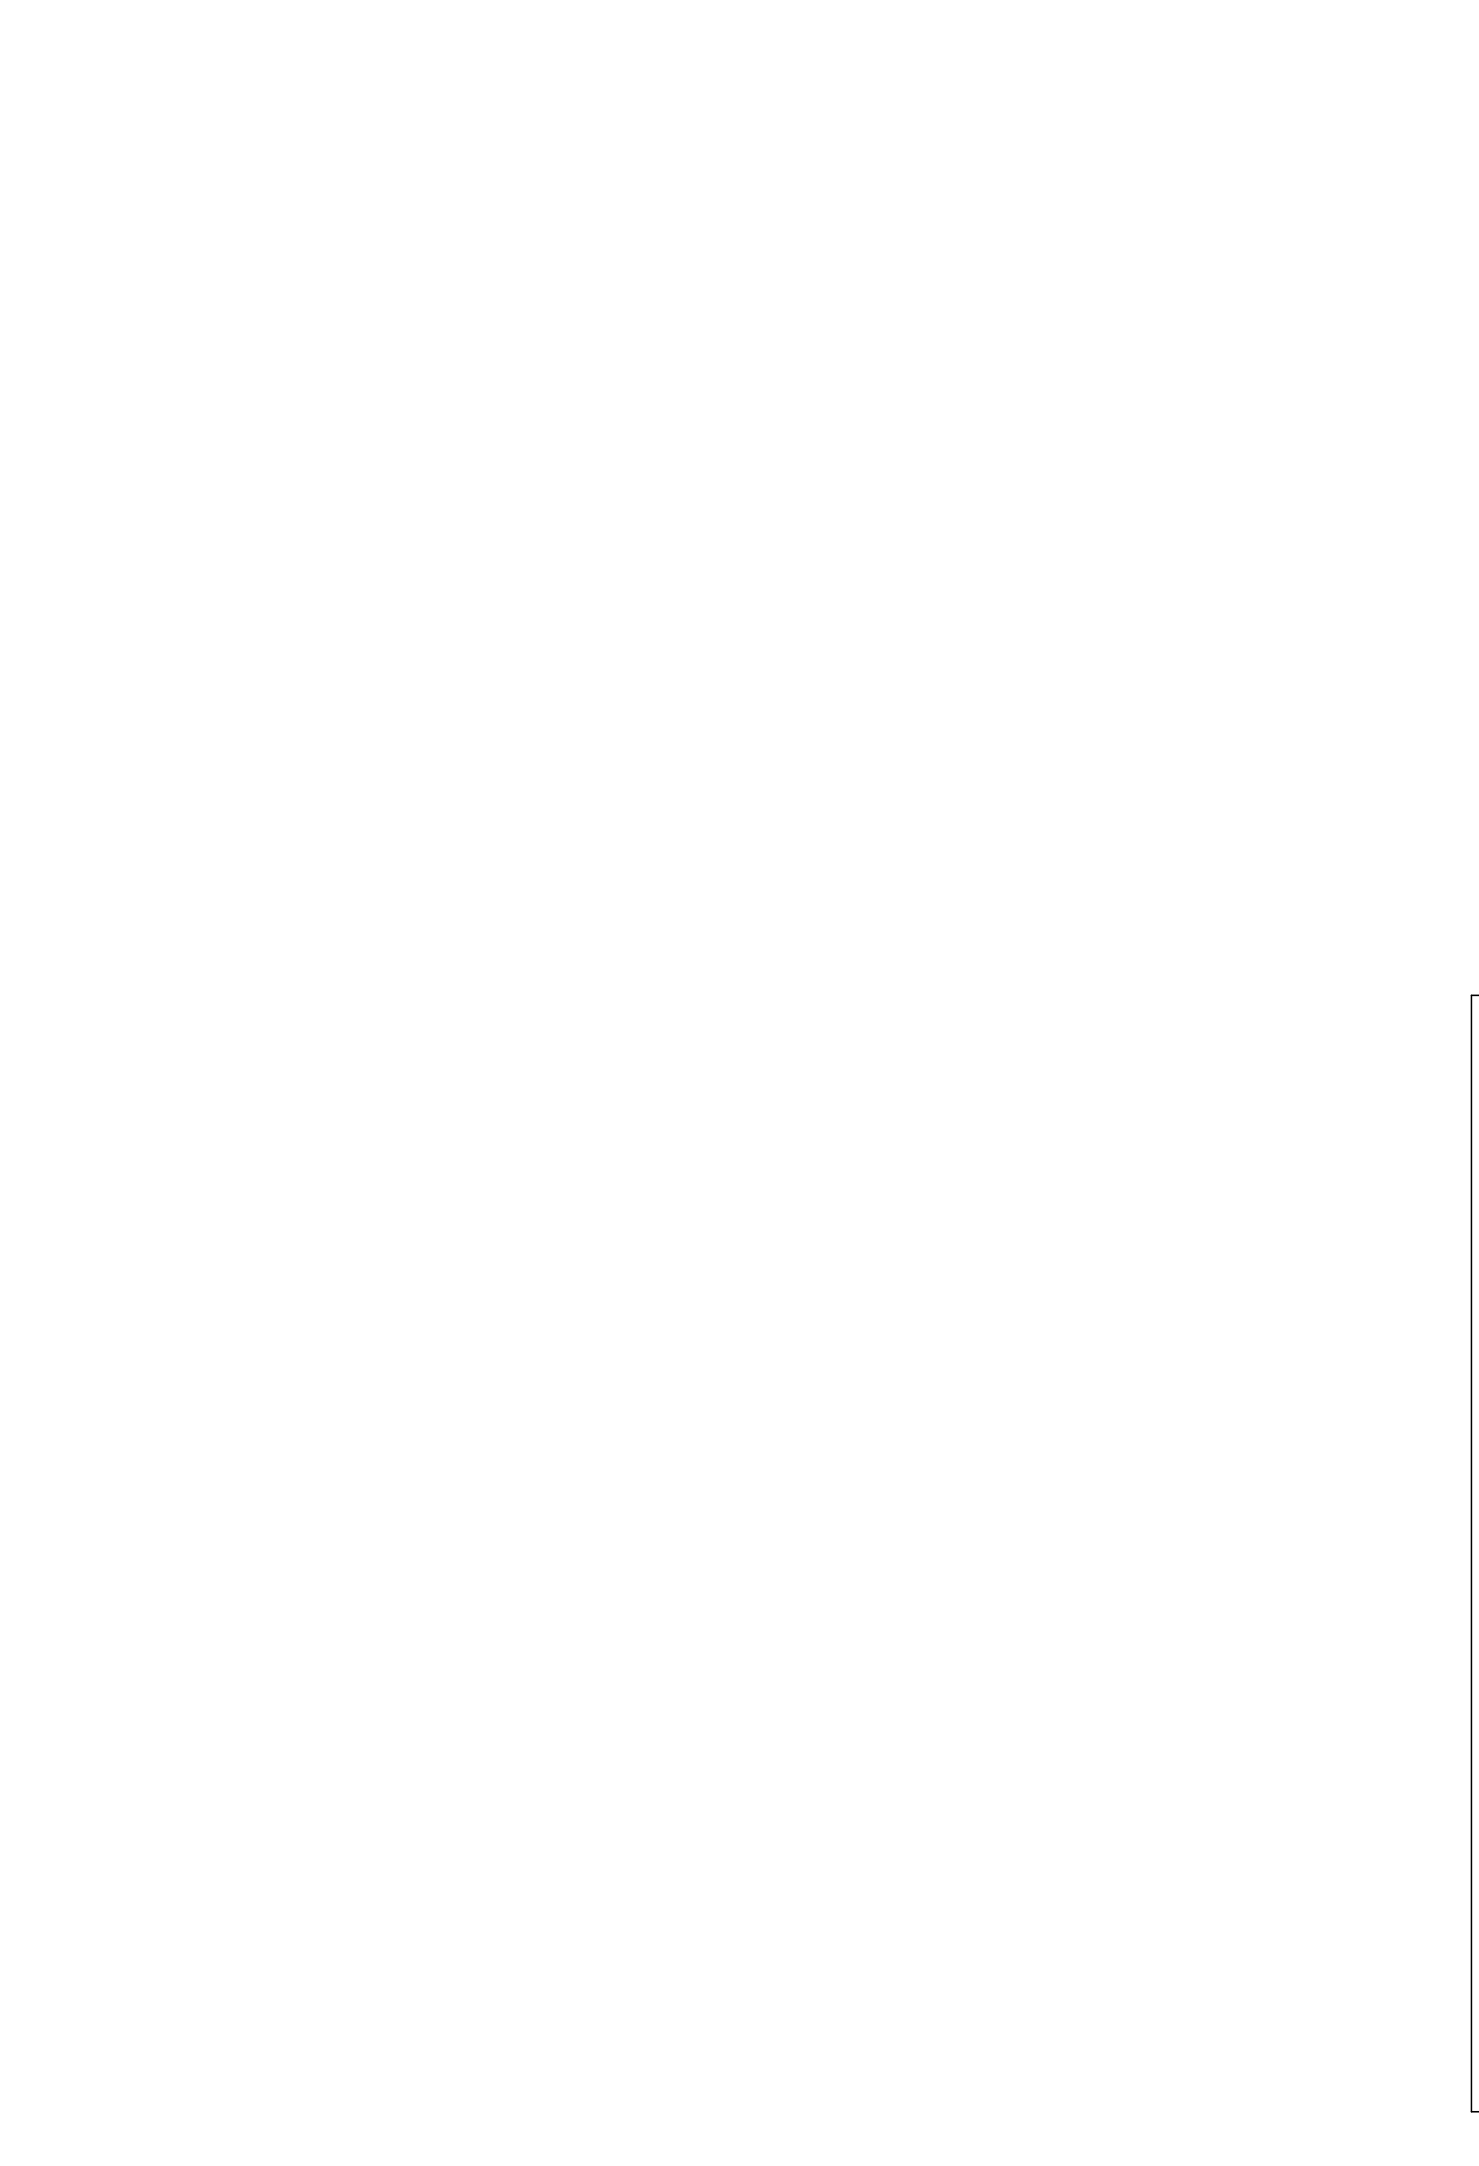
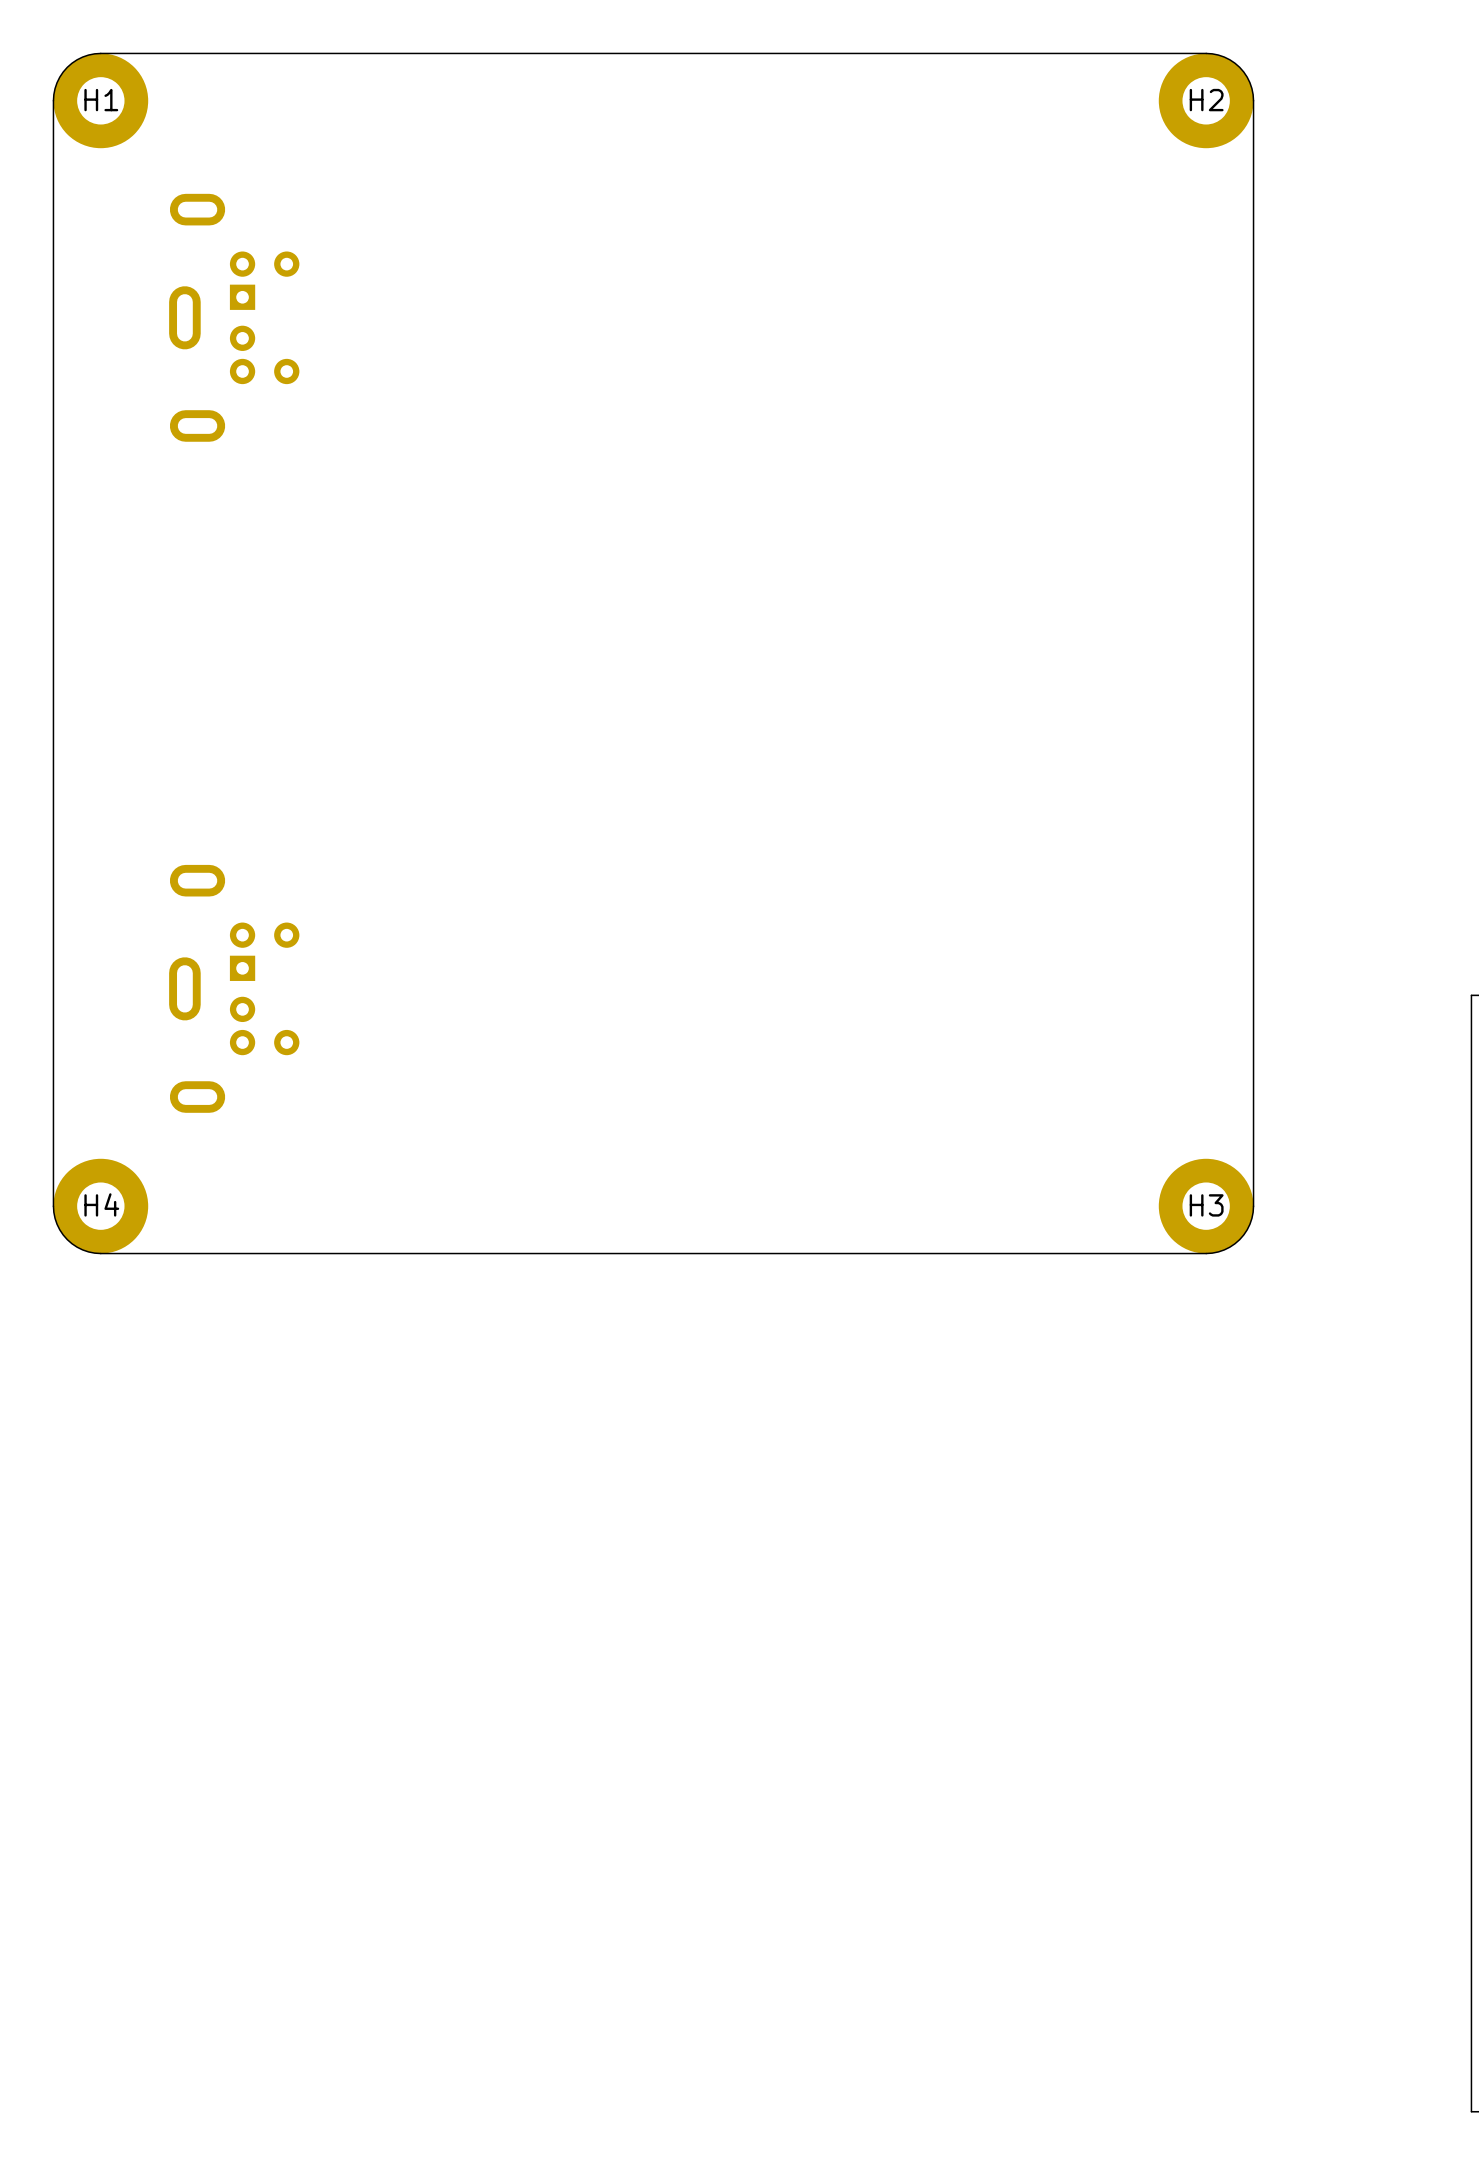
board edge: none -> (1206, 53) (100, 53) (82, 57) (67, 67) (57, 82) (53, 100) (53, 1206) (57, 1224) (67, 1239) (82, 1249) (100, 1253) (1206, 1253) (1224, 1249) (1239, 1239) (1249, 1224) (1253, 1206) (1253, 100) (1249, 82) (1239, 67) (1224, 57) (1206, 53)
H1: none -> (100, 100)
H2: none -> (1206, 100)
part: none -> (234, 317)
part: none -> (234, 988)
H4: none -> (100, 1206)
H3: none -> (1206, 1206)

